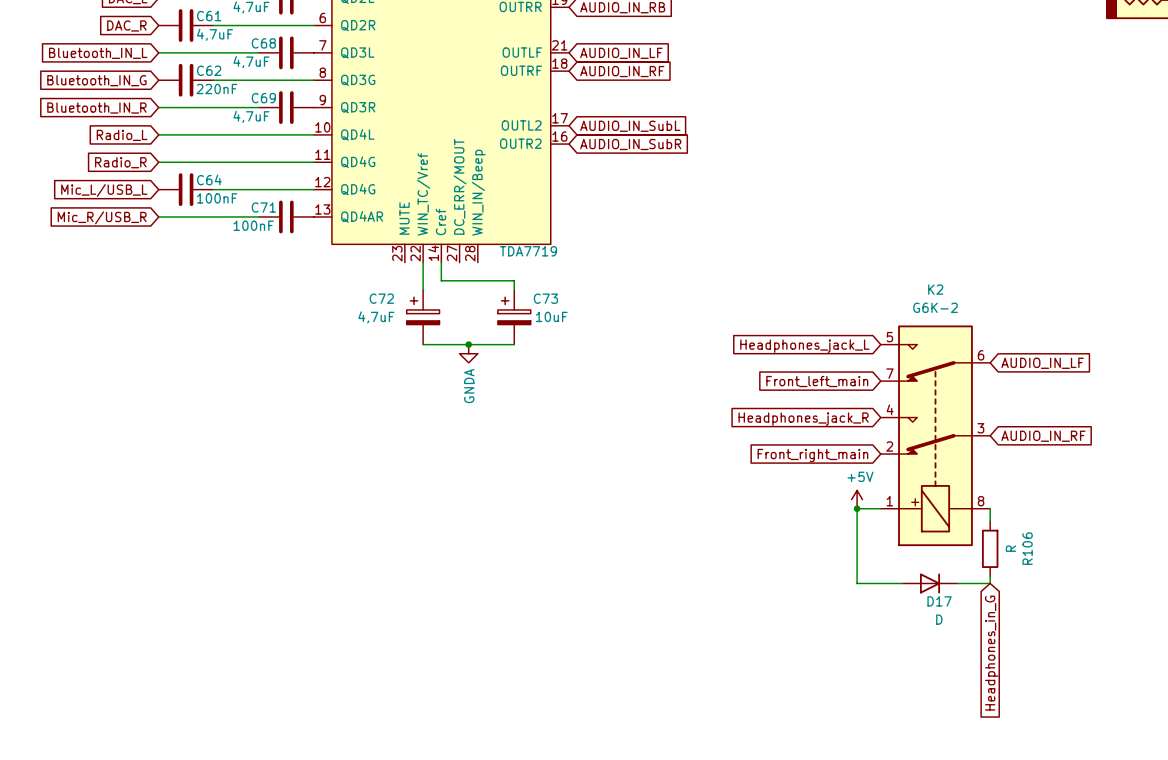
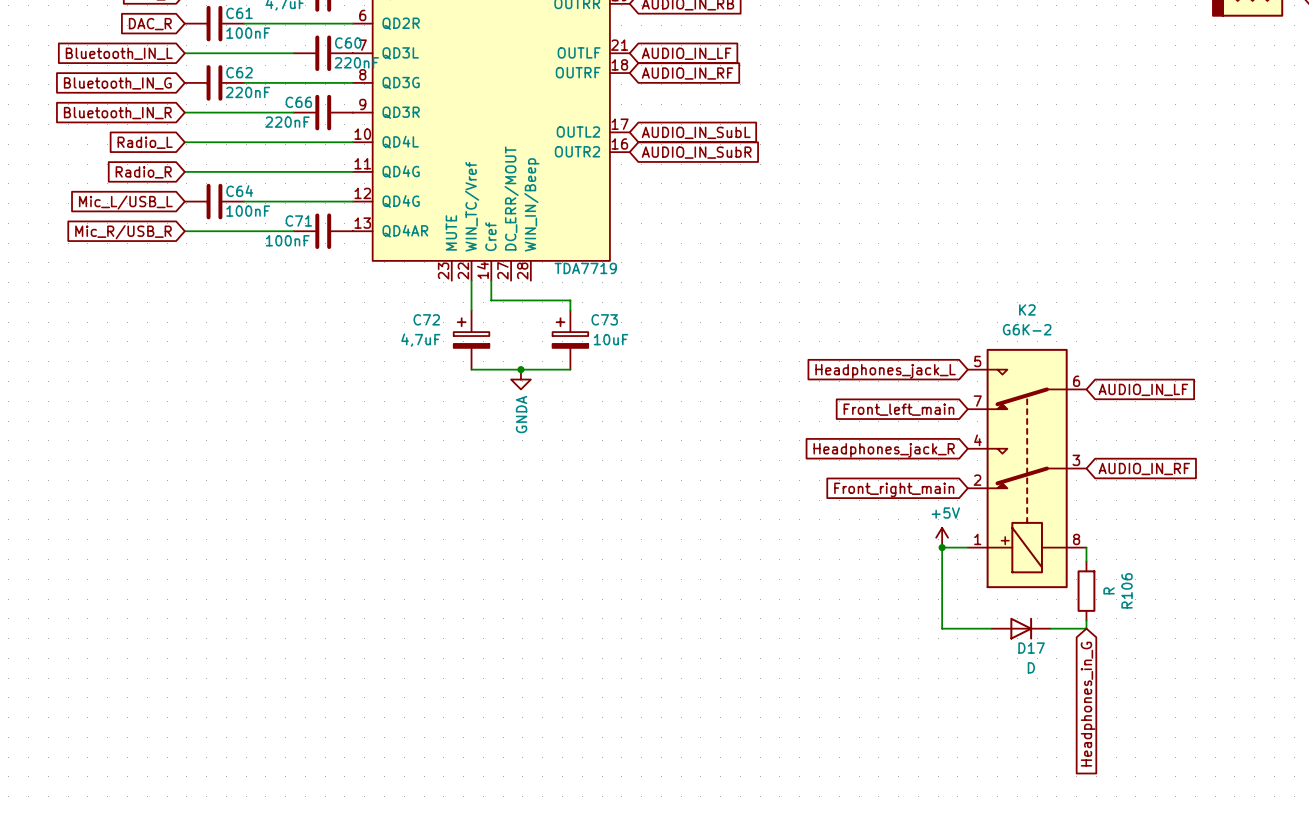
C61 value: 4,7uF (215, 34) -> 100nF (248, 33)
C68 name: C68 (263, 43) -> C60 (348, 43)
C68 value: 4,7uF (251, 62) -> 220nF (356, 62)
C69 name: C69 (263, 98) -> C66 (298, 102)
C69 value: 4,7uF (251, 116) -> 220nF (287, 122)

